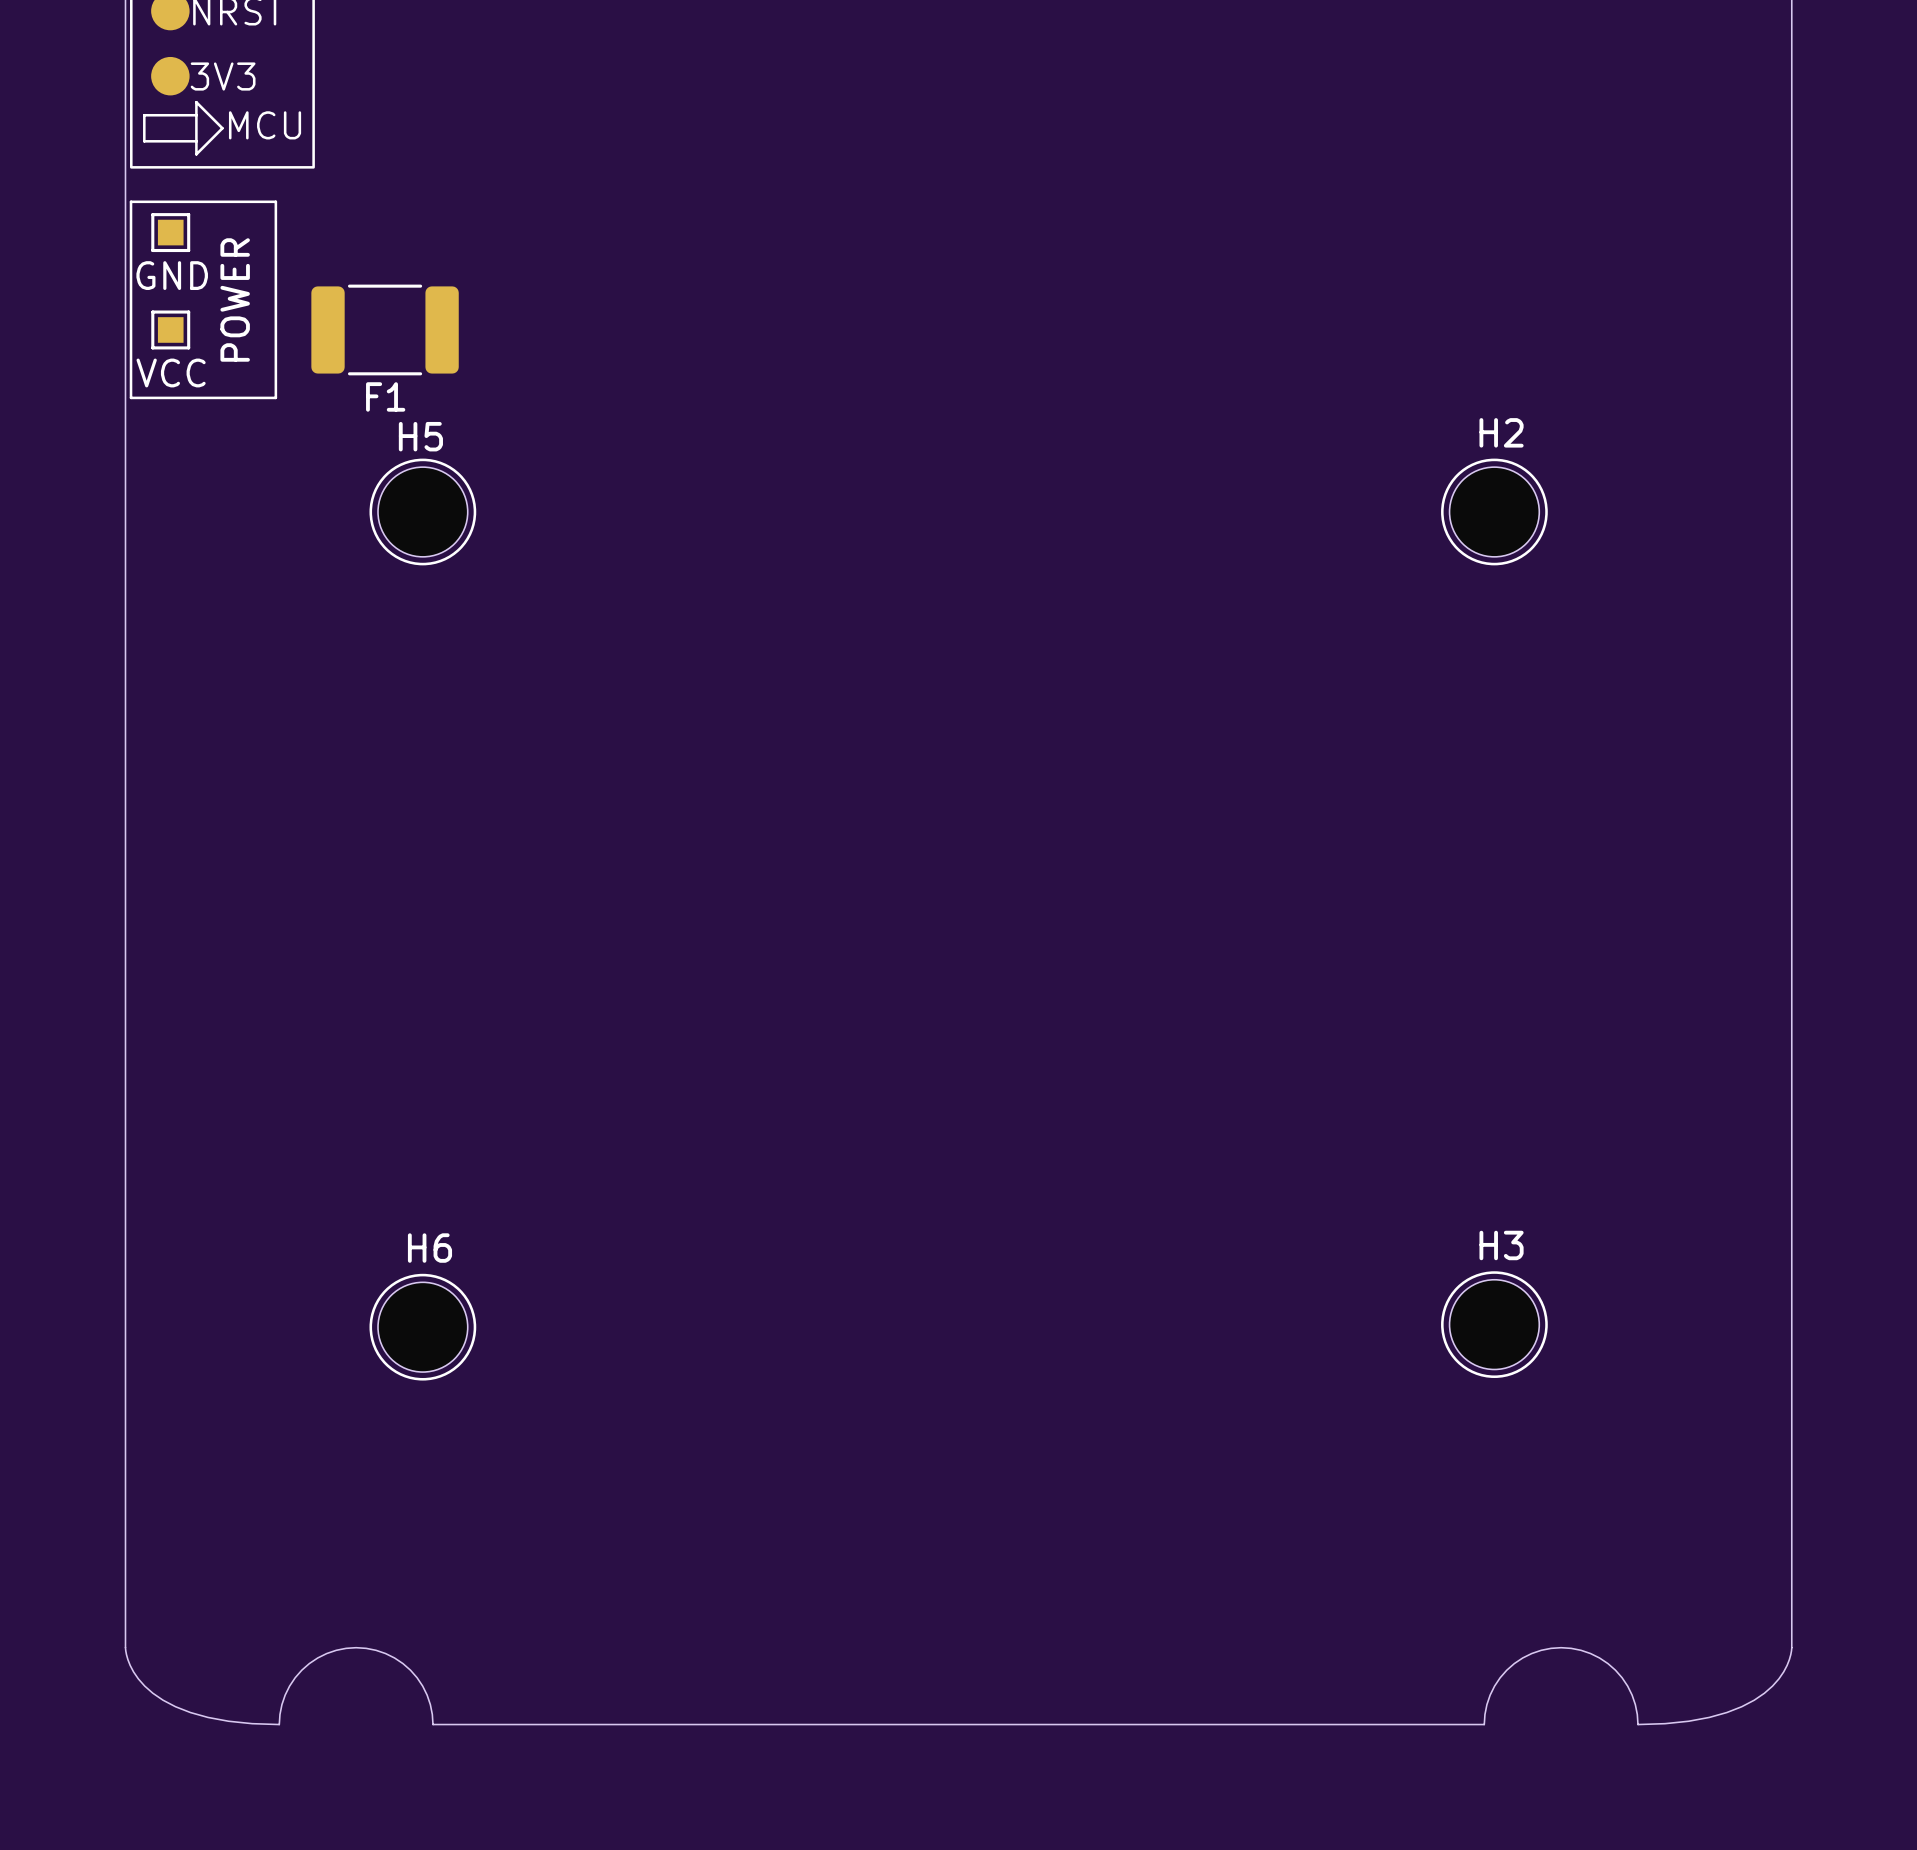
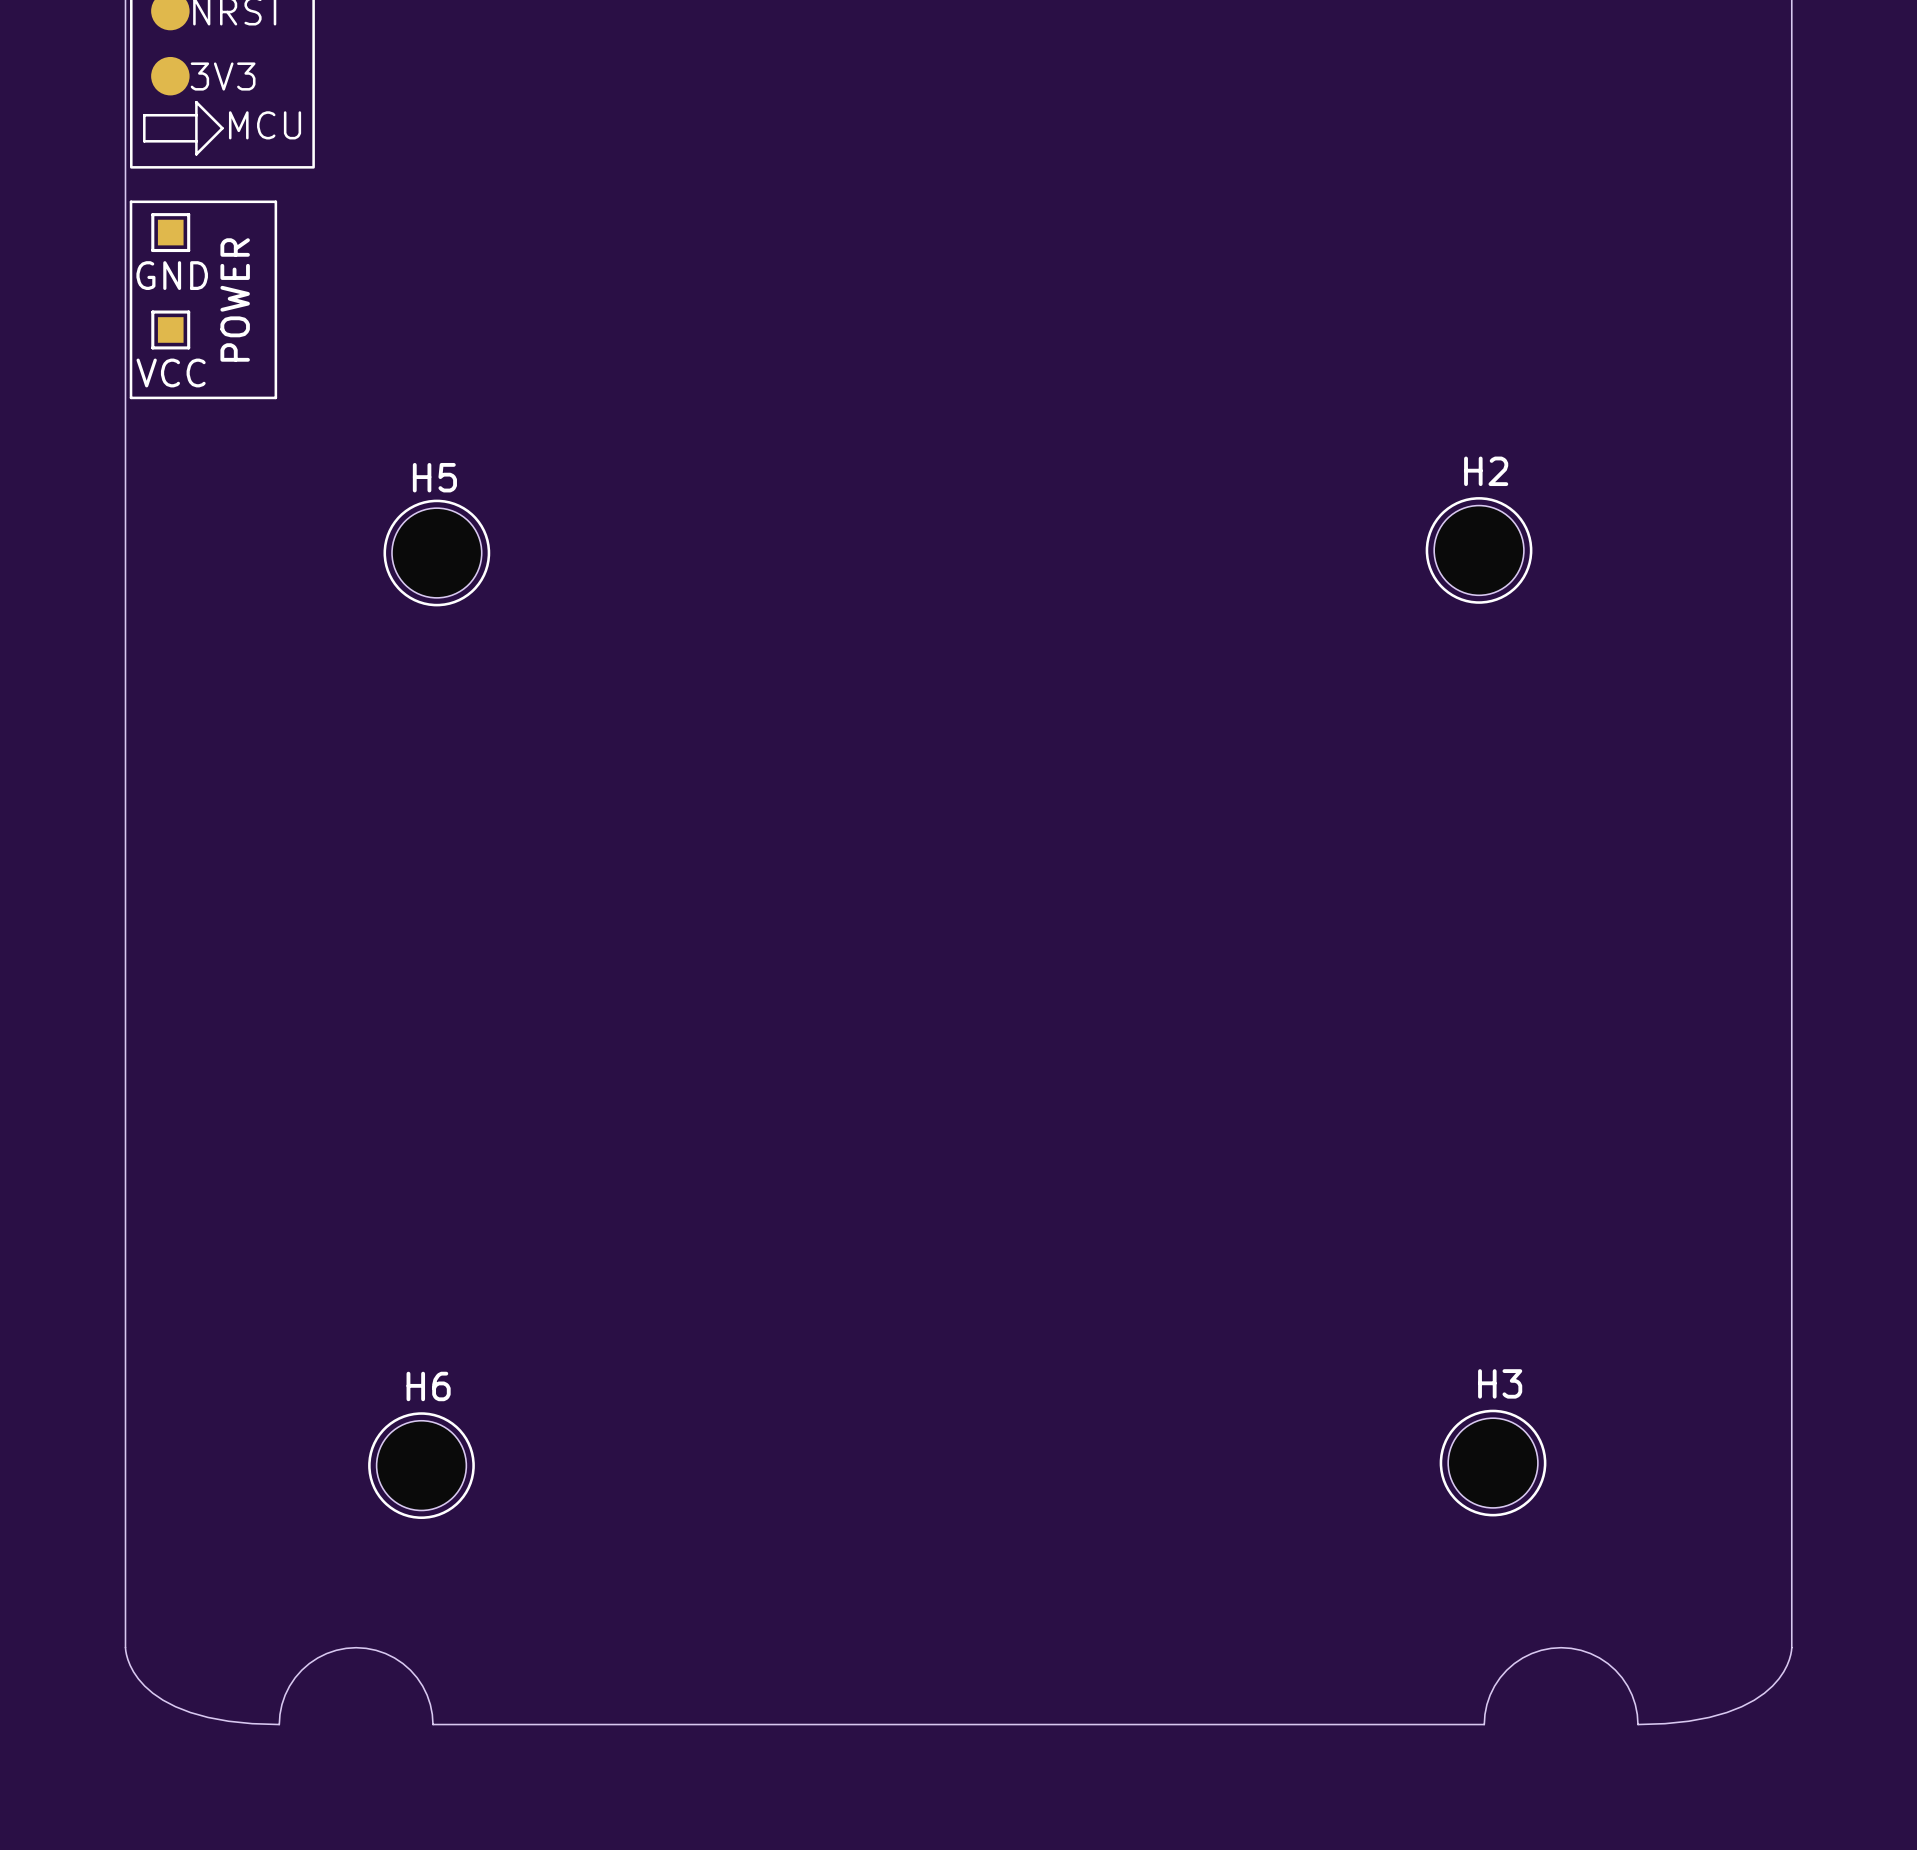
F1: (385, 329) -> none
H5 position: (422, 511) -> (436, 553)
H2 position: (1494, 511) -> (1479, 550)
H3 position: (1494, 1324) -> (1493, 1463)
H6 position: (422, 1327) -> (421, 1465)

